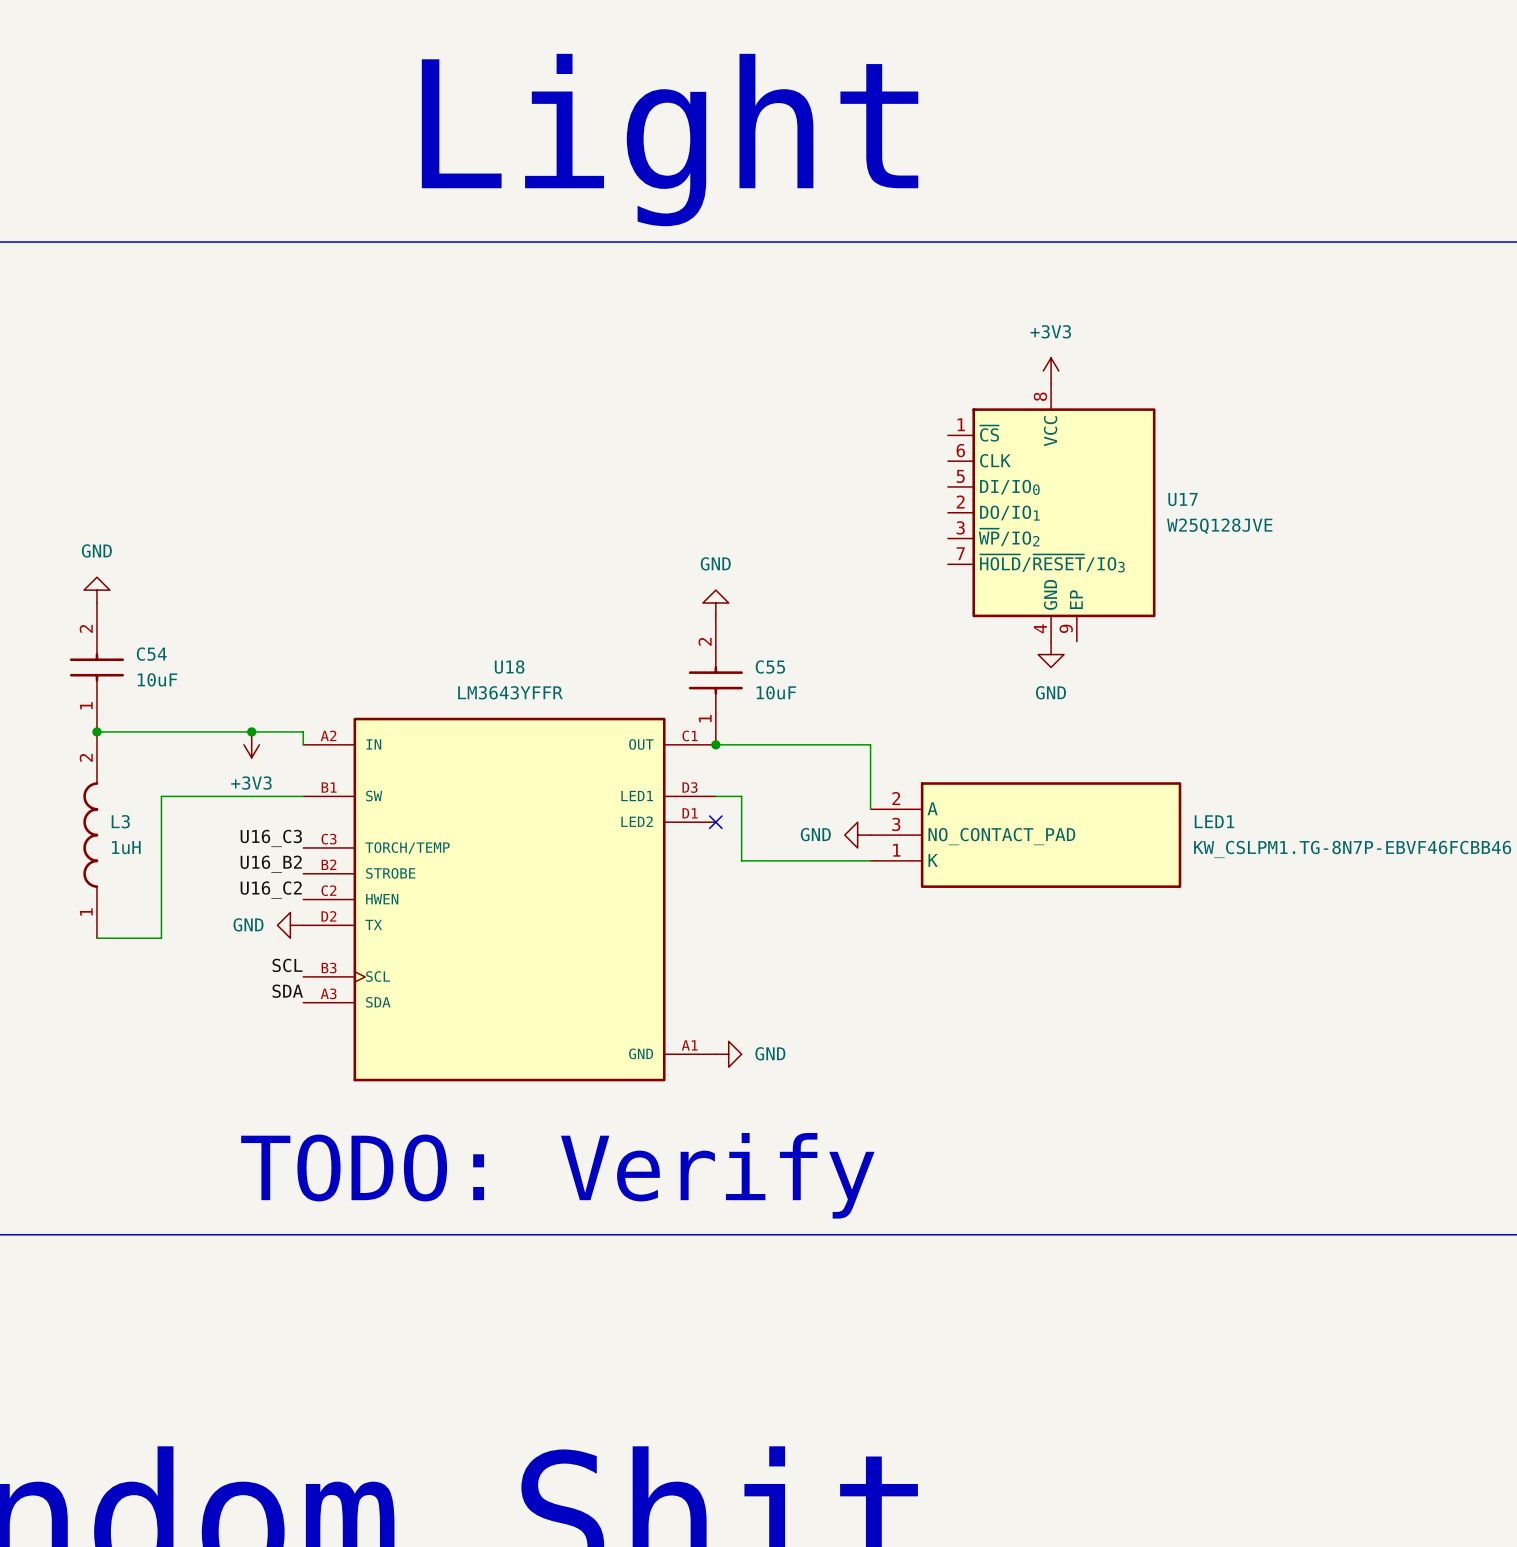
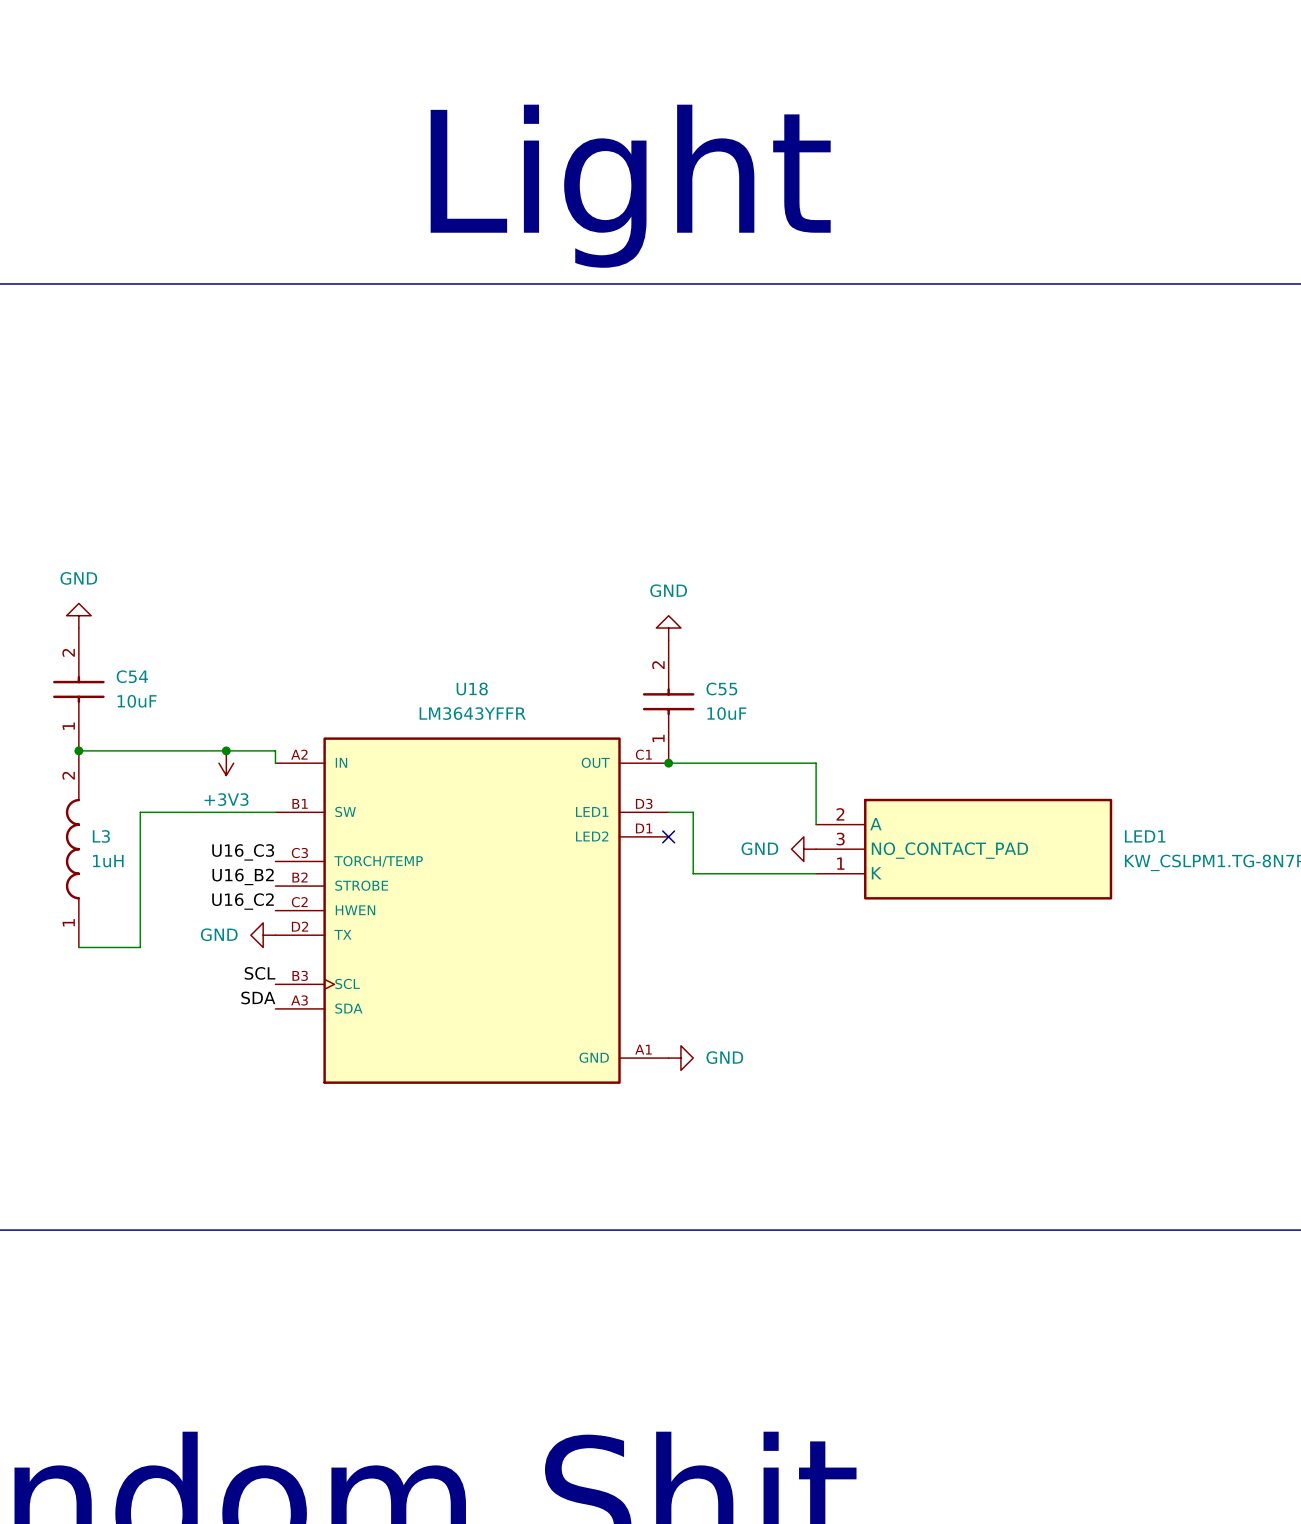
power symbol: +3V3 (1051, 370) -> none
U17: W25Q128JVE (1051, 512) -> none
power symbol: GND (1051, 654) -> none
text: TODO: Verify (557, 1175) -> none

